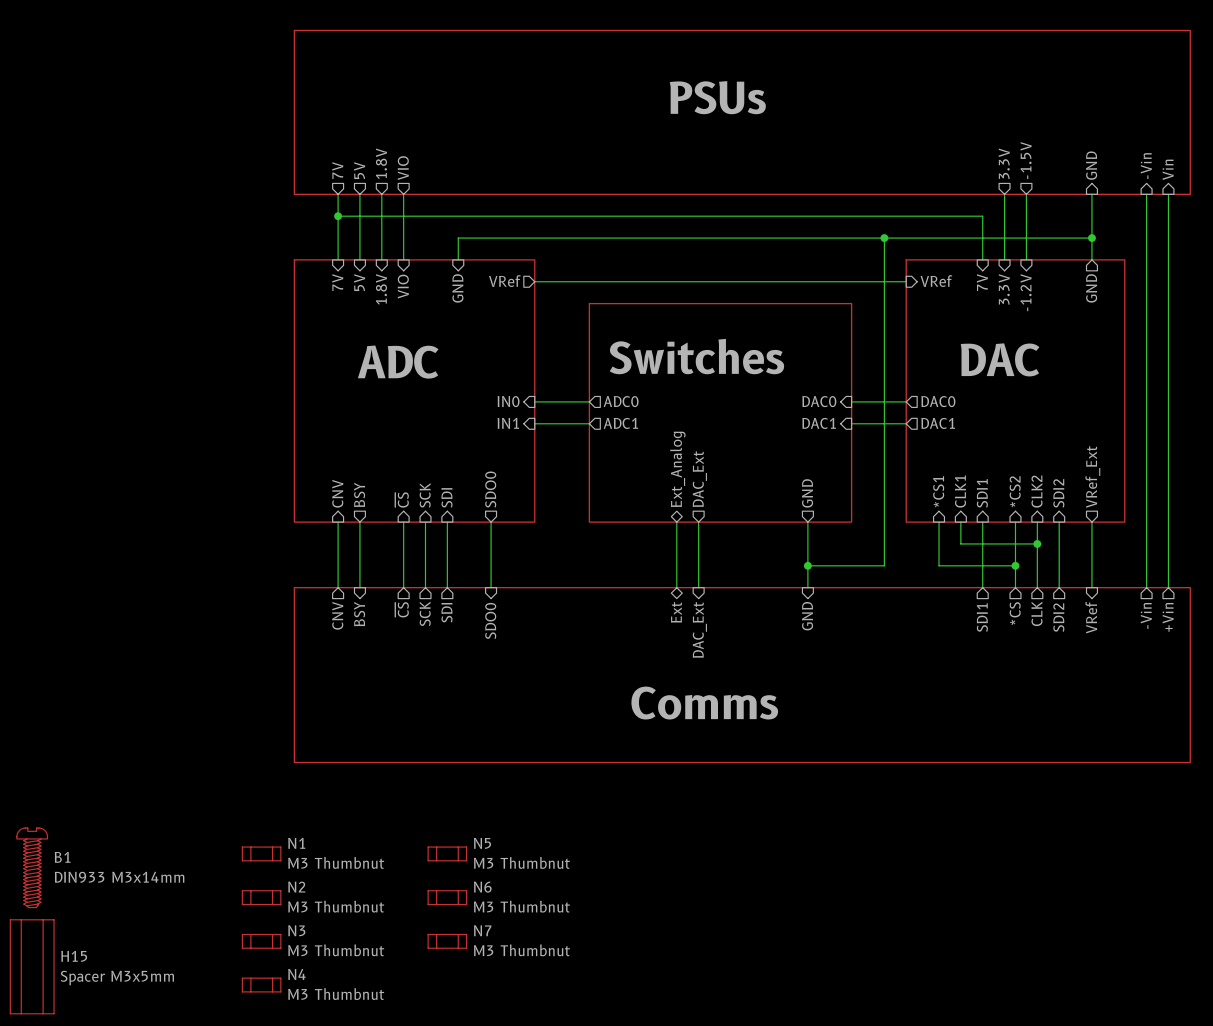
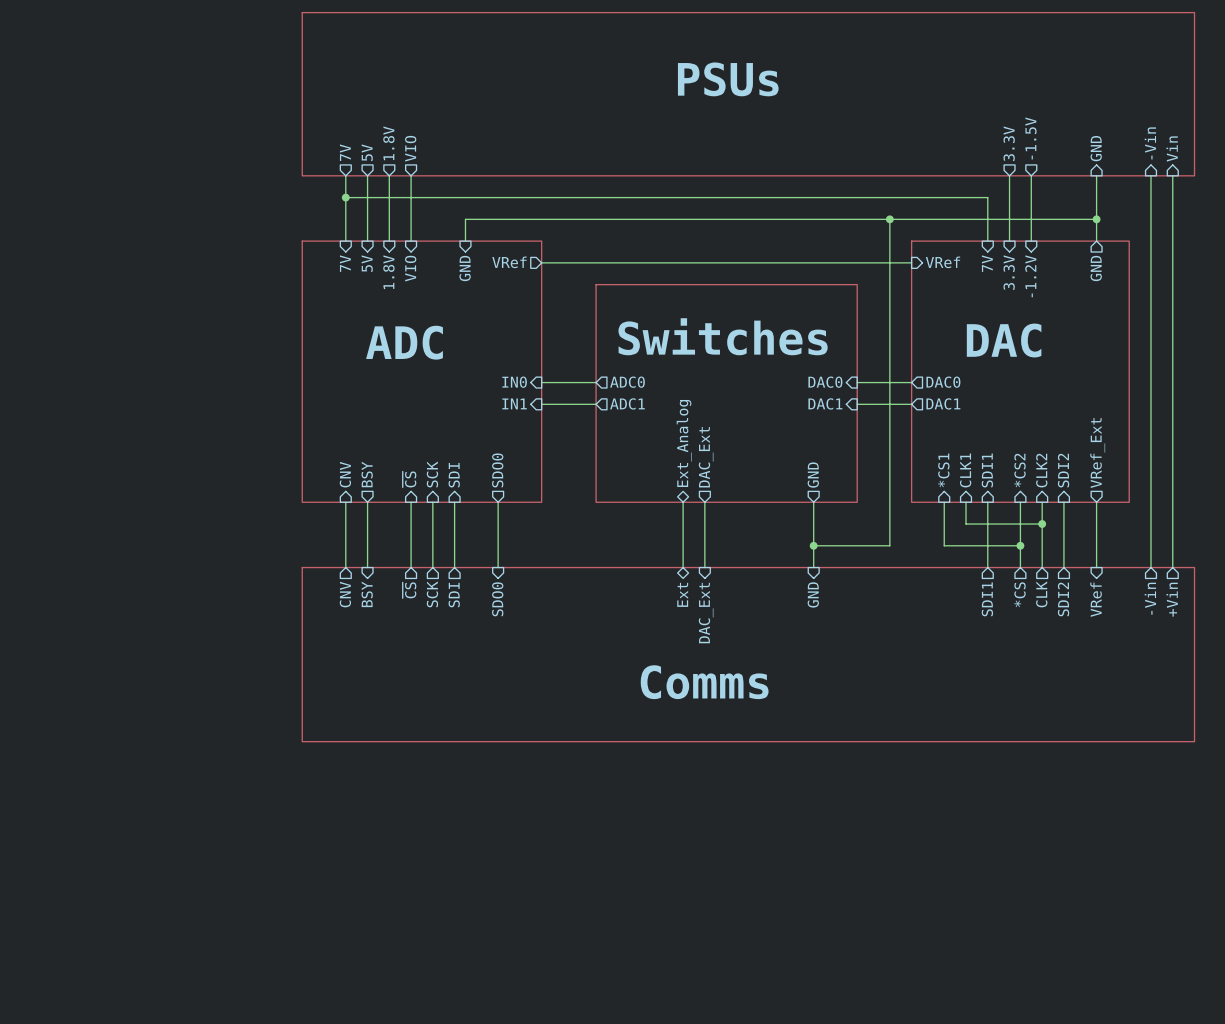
N1: M3 Thumbnut (261, 853) -> none
N5: M3 Thumbnut (447, 853) -> none
B1: DIN933 M3x14mm (32, 867) -> none
N2: M3 Thumbnut (261, 897) -> none
N6: M3 Thumbnut (447, 897) -> none
N3: M3 Thumbnut (261, 941) -> none
N7: M3 Thumbnut (447, 941) -> none
H15: Spacer M3x5mm (32, 966) -> none
N4: M3 Thumbnut (261, 985) -> none

